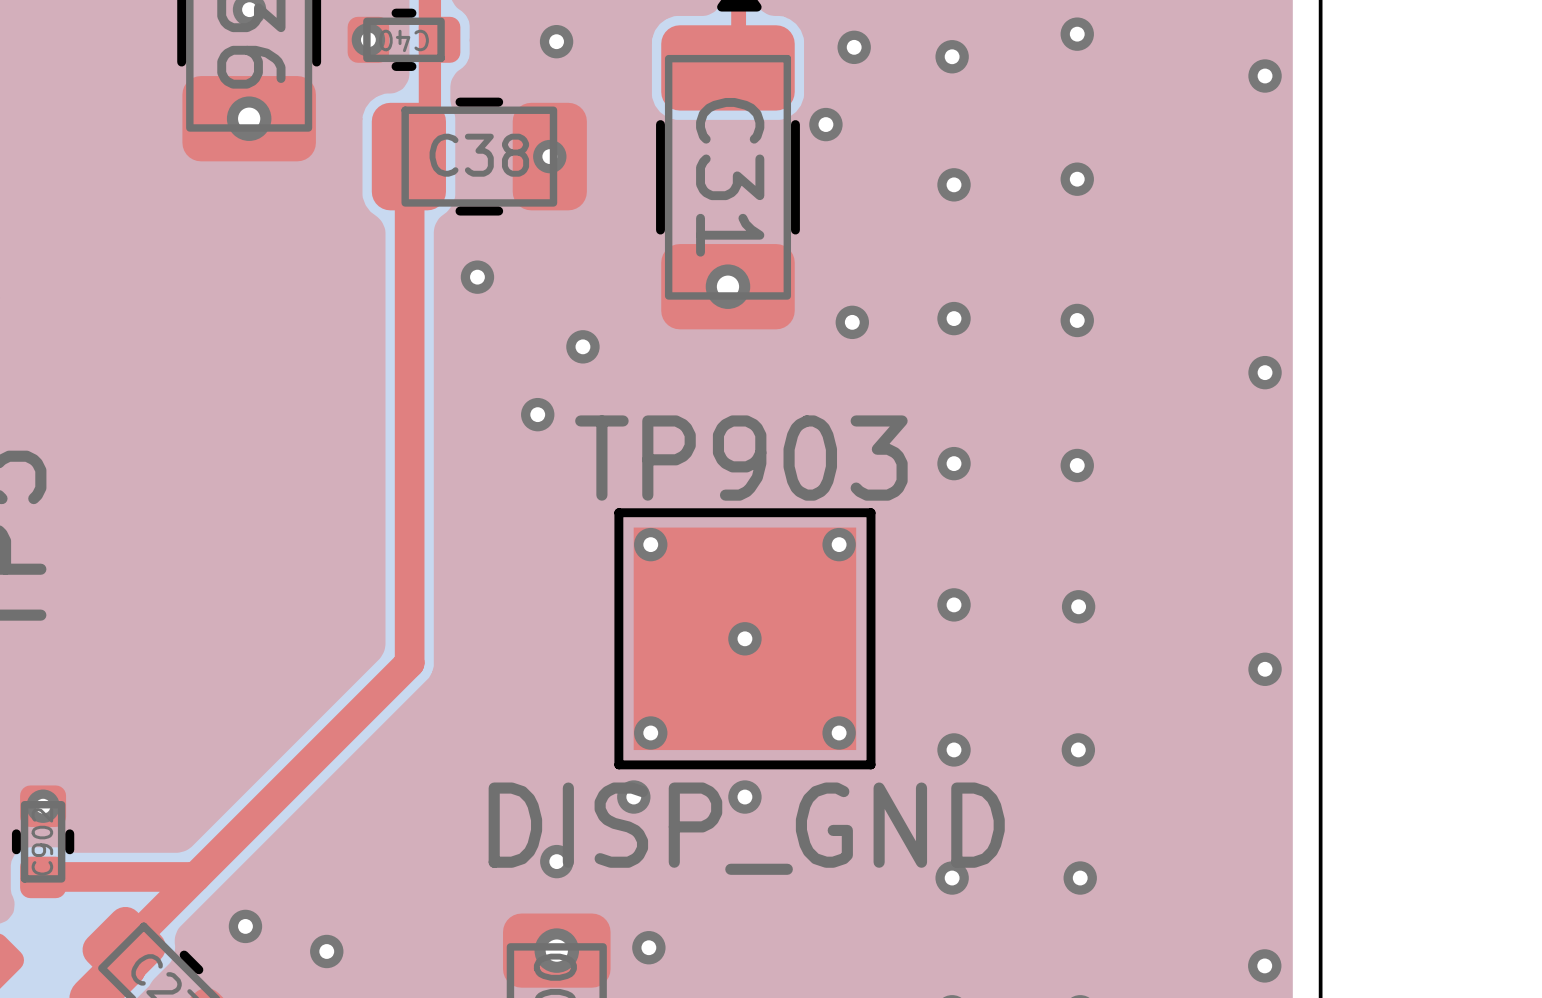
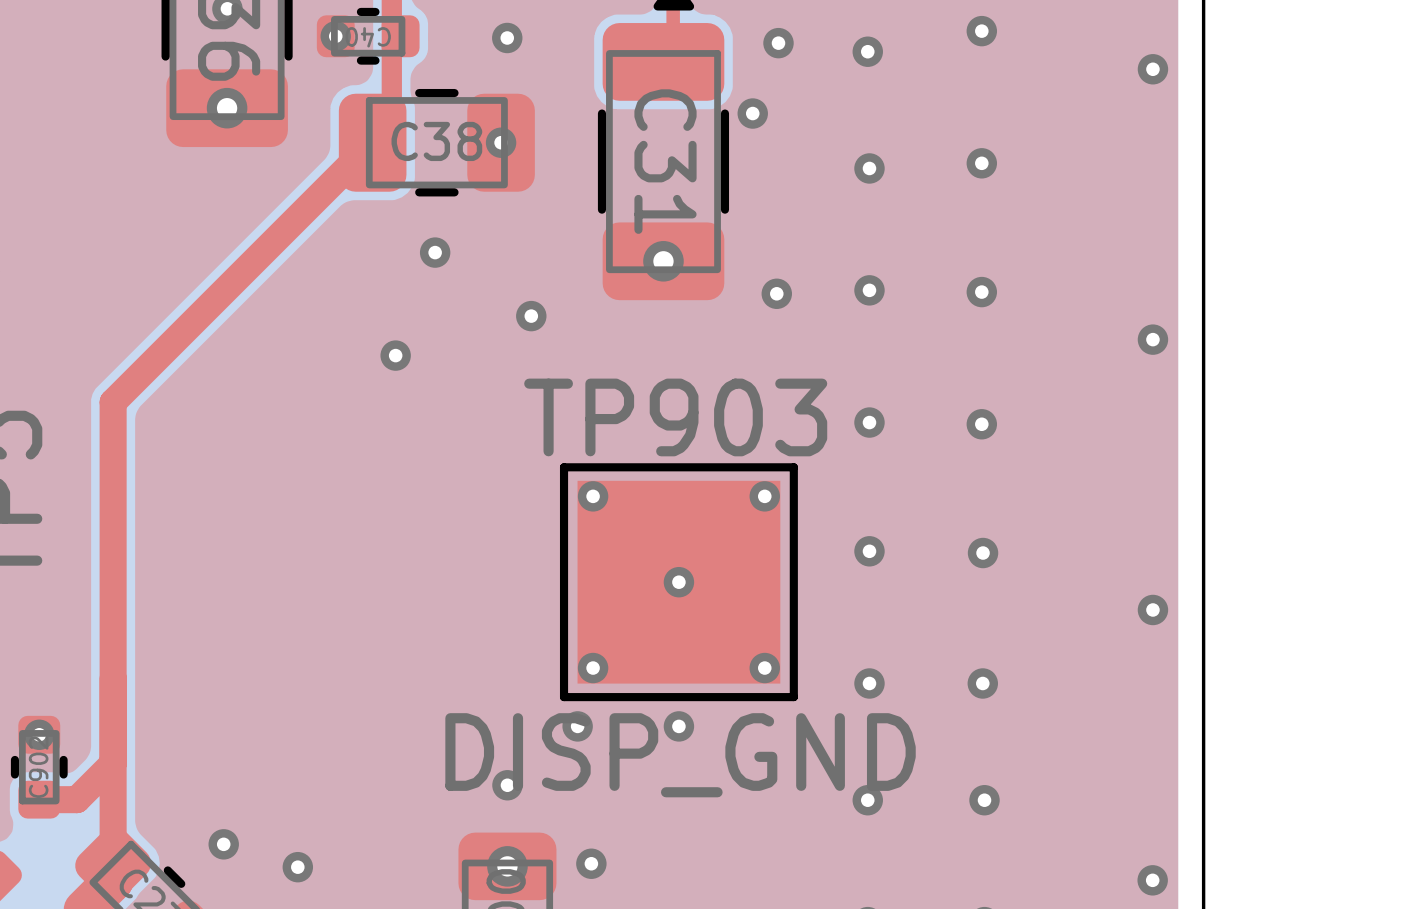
top track: (409, 157) (409, 663) (124, 948) -> (372, 142) (113, 402) (113, 864)
via position: (537, 414) -> (395, 355)
top track: (43, 876) (195, 876) -> (39, 799) (76, 799) (113, 763)

